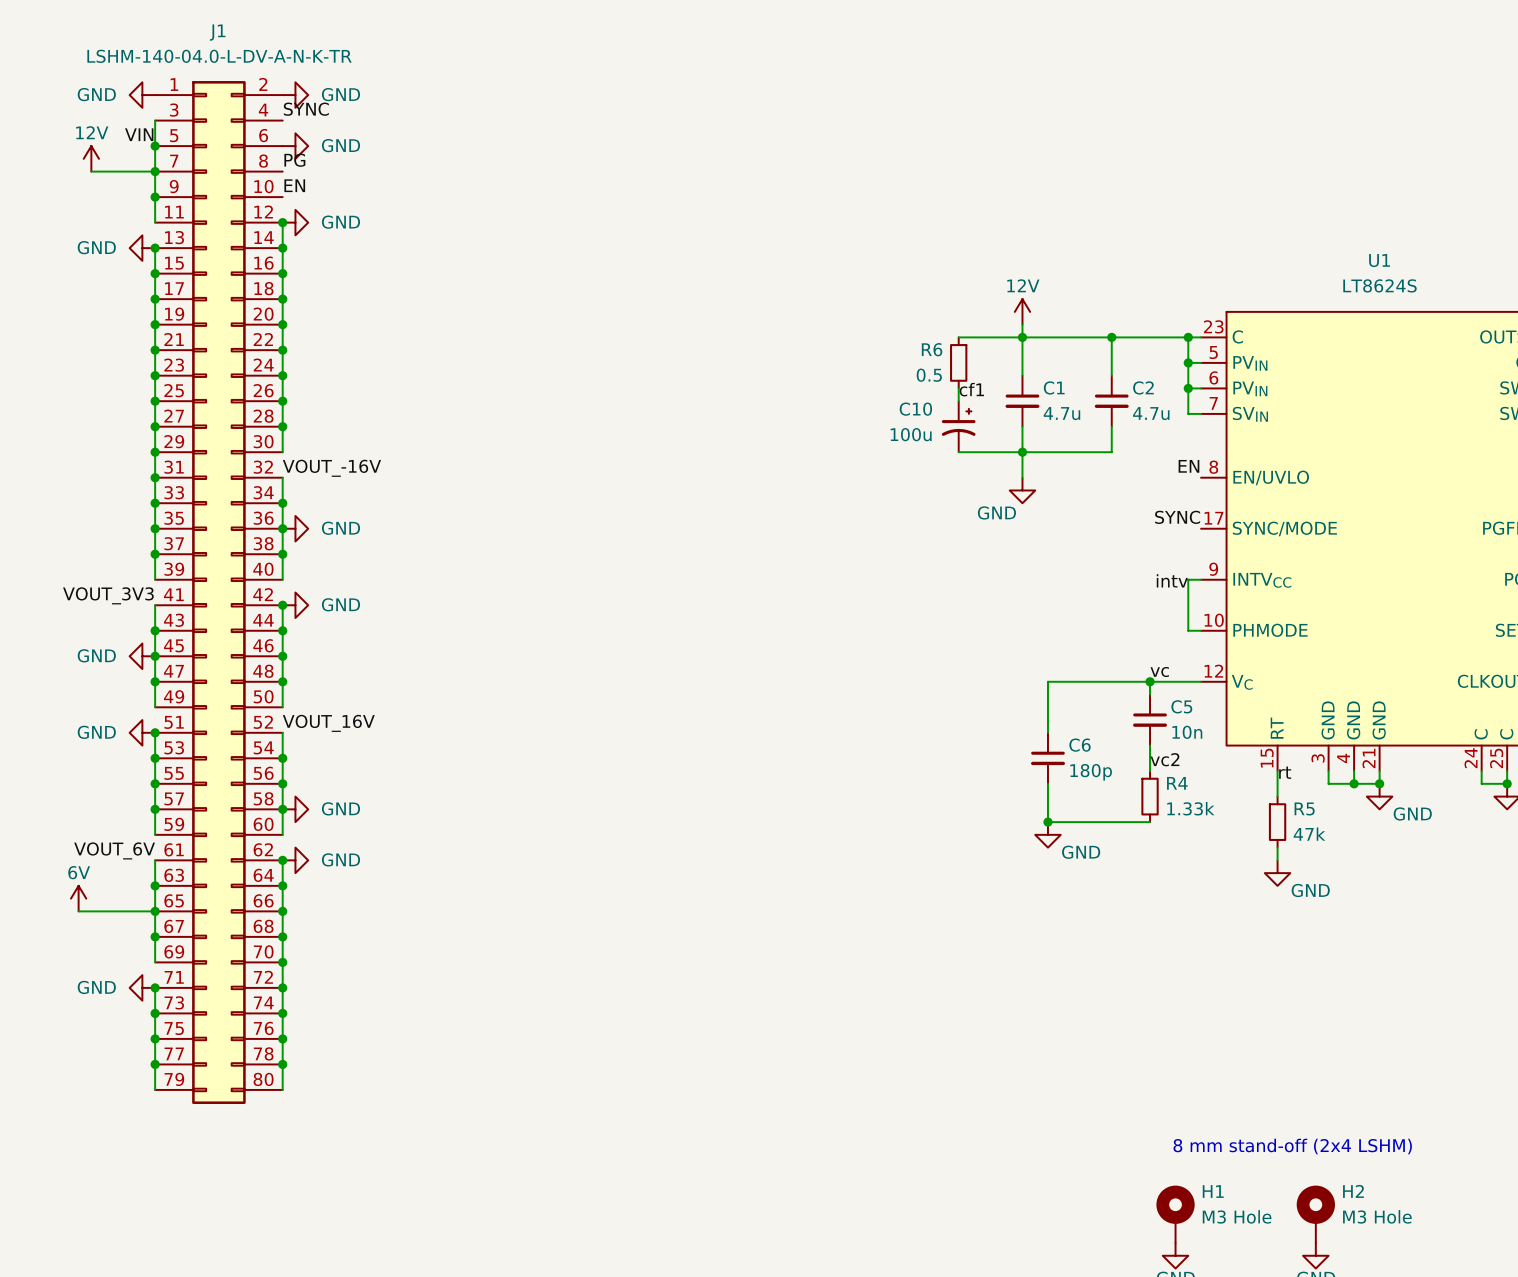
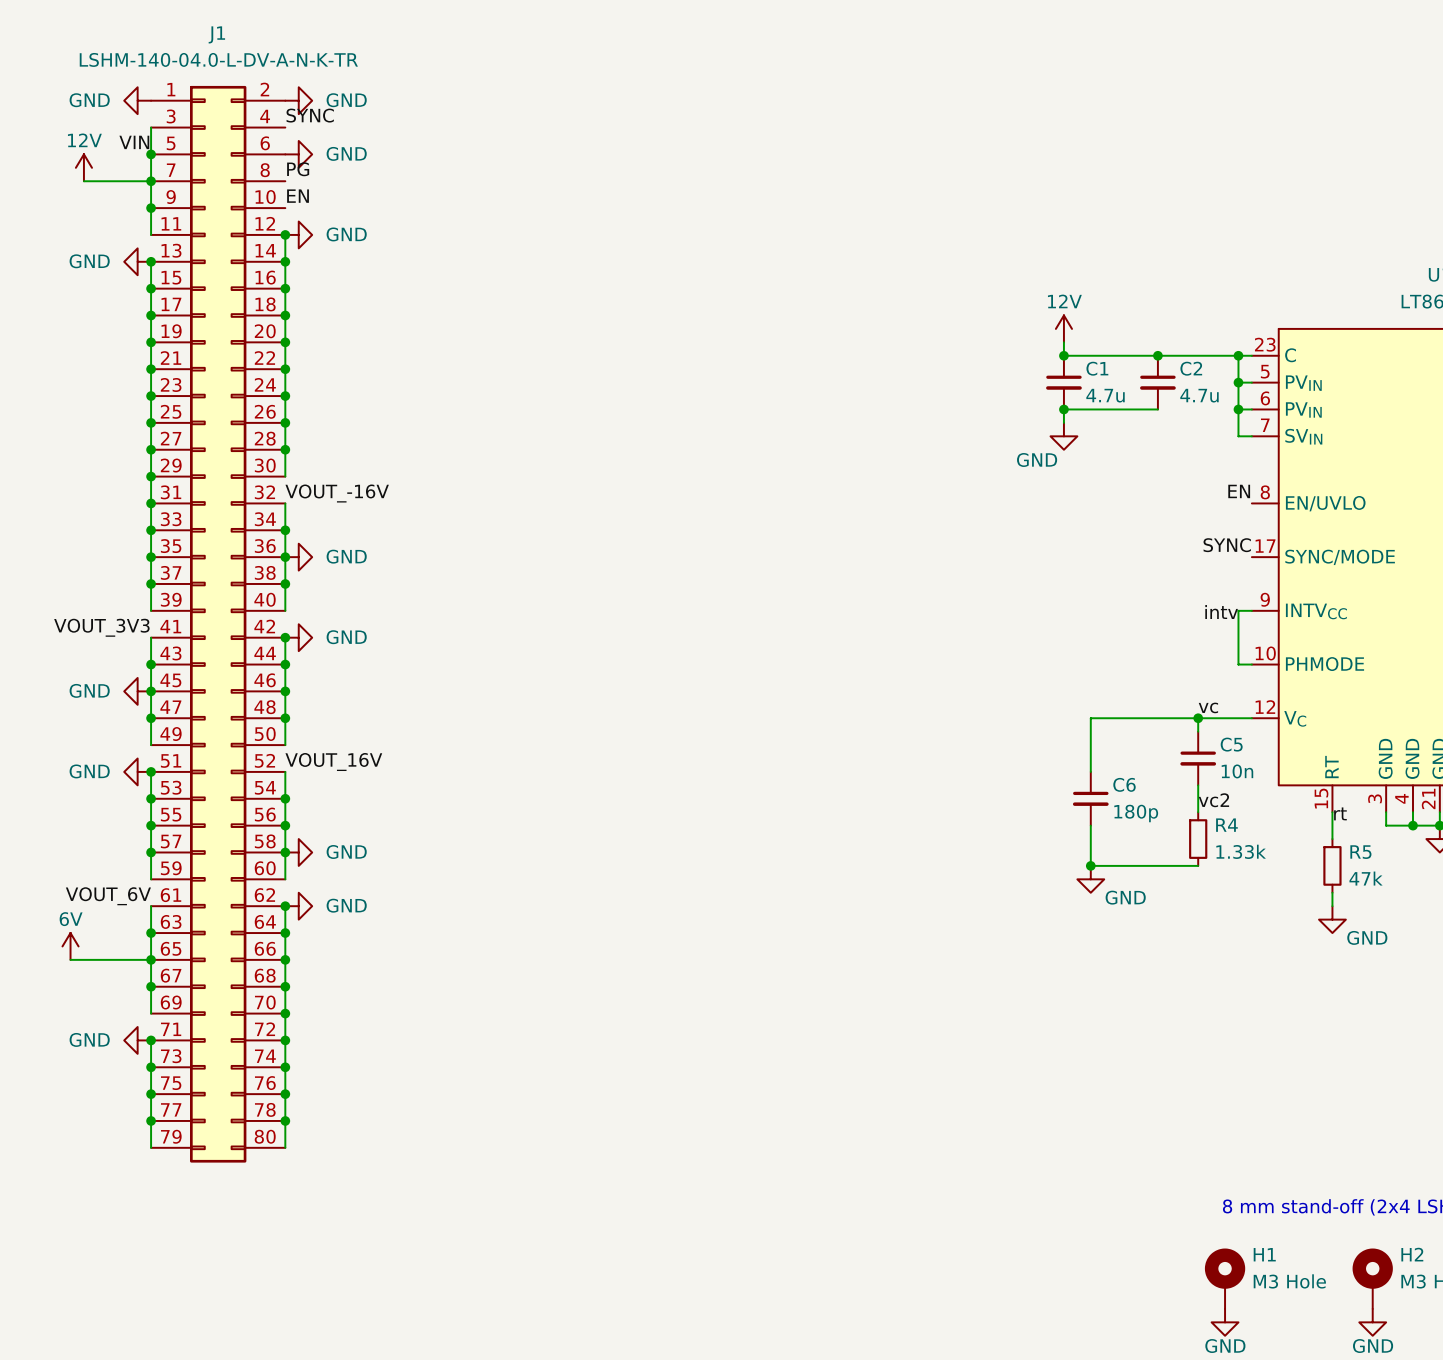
wire: (958, 337) (1022, 337) (1022, 375) -> none
R6: 0.5 (958, 362) -> none
wire: (958, 388) (958, 401) -> none
junction: none -> (1063, 409)
wire: none -> (1157, 409) (1063, 409) (1063, 422)
label: cf1 (971, 389) -> none
C1 position: (1022, 401) -> (1063, 382)
C2 position: (1111, 401) -> (1157, 382)
C10: 100u (958, 426) -> none
wire: (1022, 426) (1022, 477) -> none
wire: (1111, 426) (1111, 452) (958, 452) -> none
junction: (1022, 452) -> none
power symbol position: GND (1022, 490) -> GND (1063, 436)

